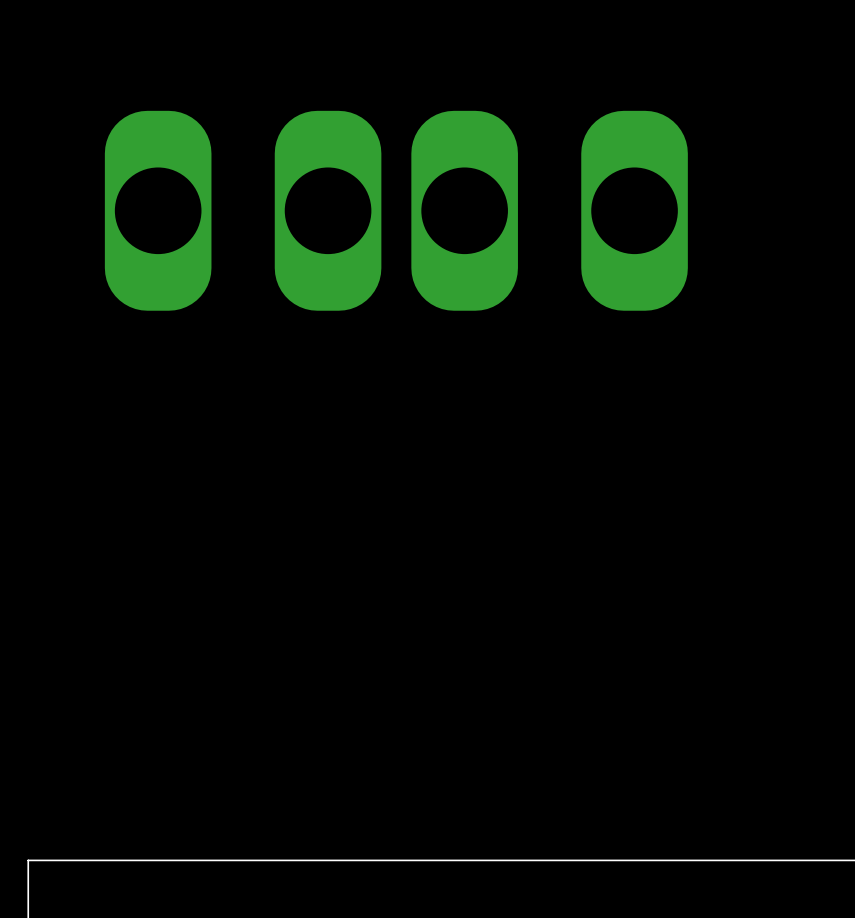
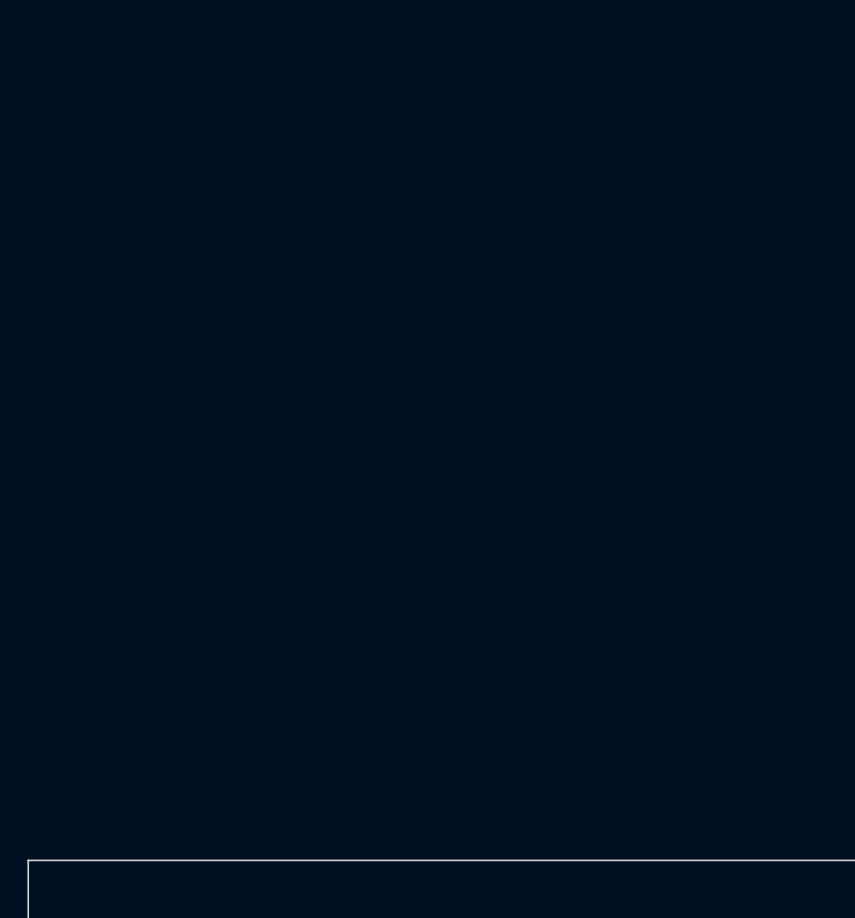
part: (396, 210) -> none

